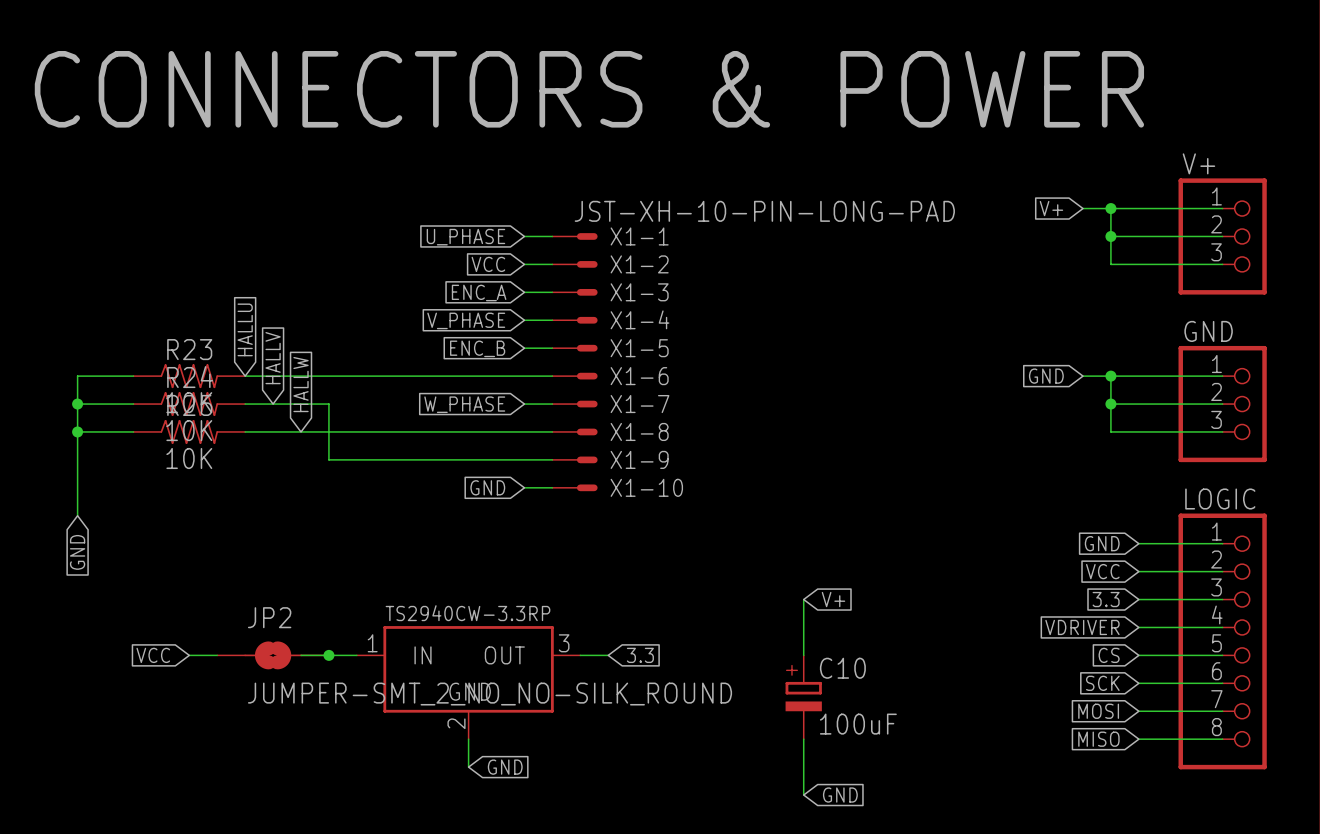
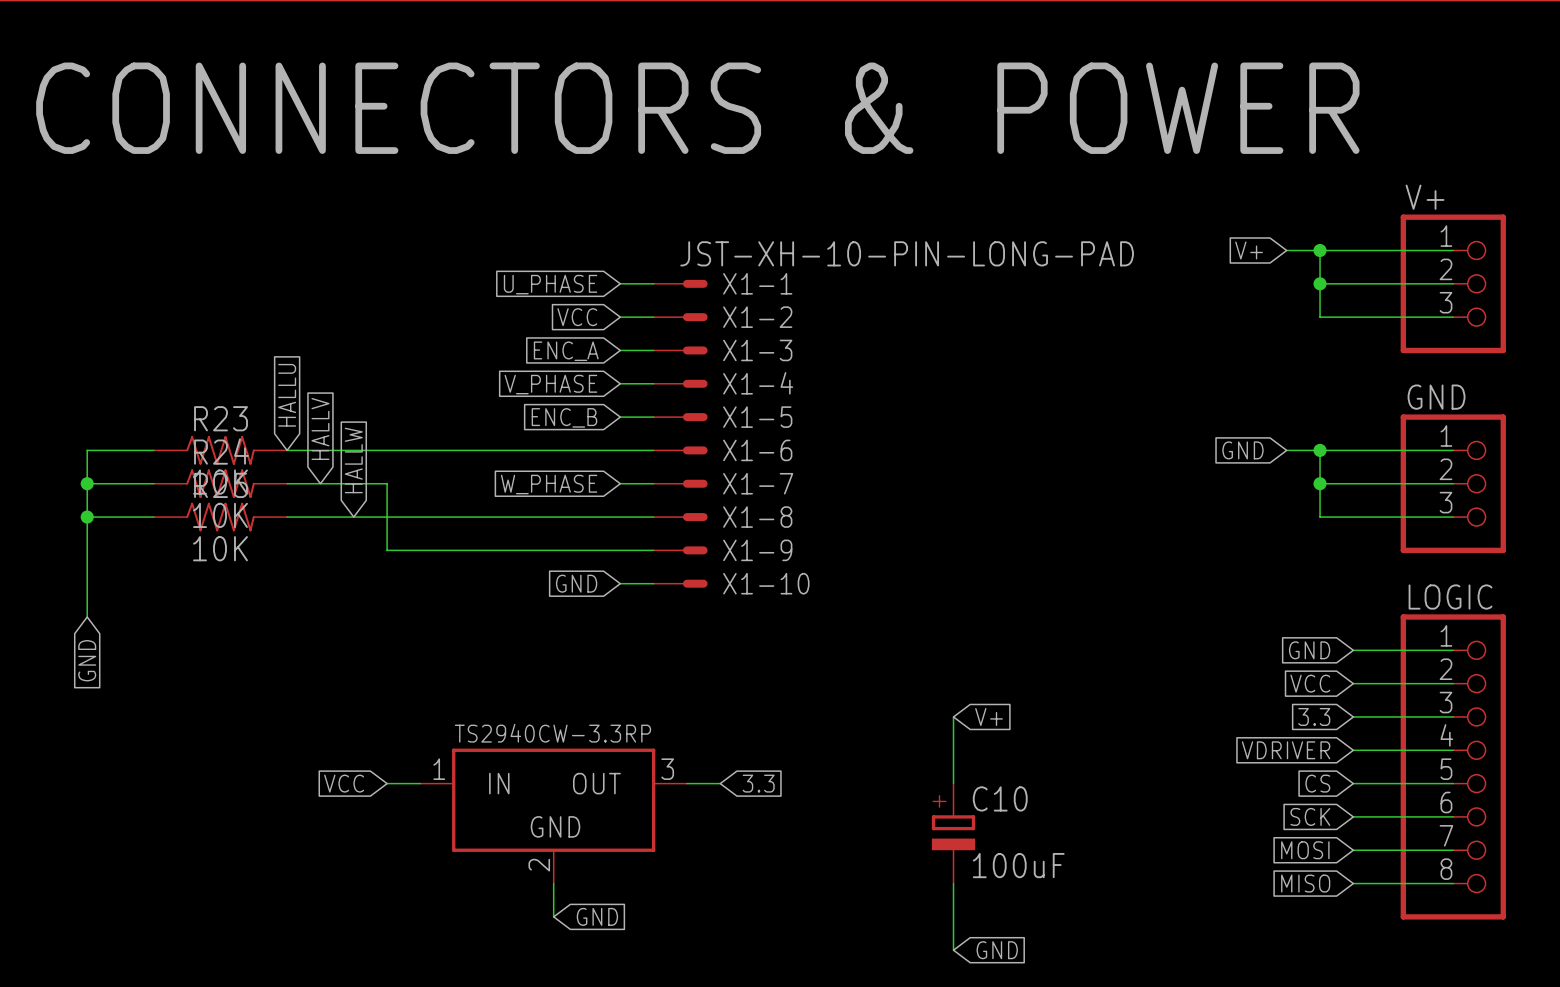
global label position: VCC (153, 655) -> VCC (344, 783)
wire: (189, 655) (217, 655) -> none
JP2: JUMPER-SMT_2_NO_NO-SILK_ROUND (273, 655) -> none
wire: (301, 655) (328, 655) -> none
junction: (328, 655) -> none

